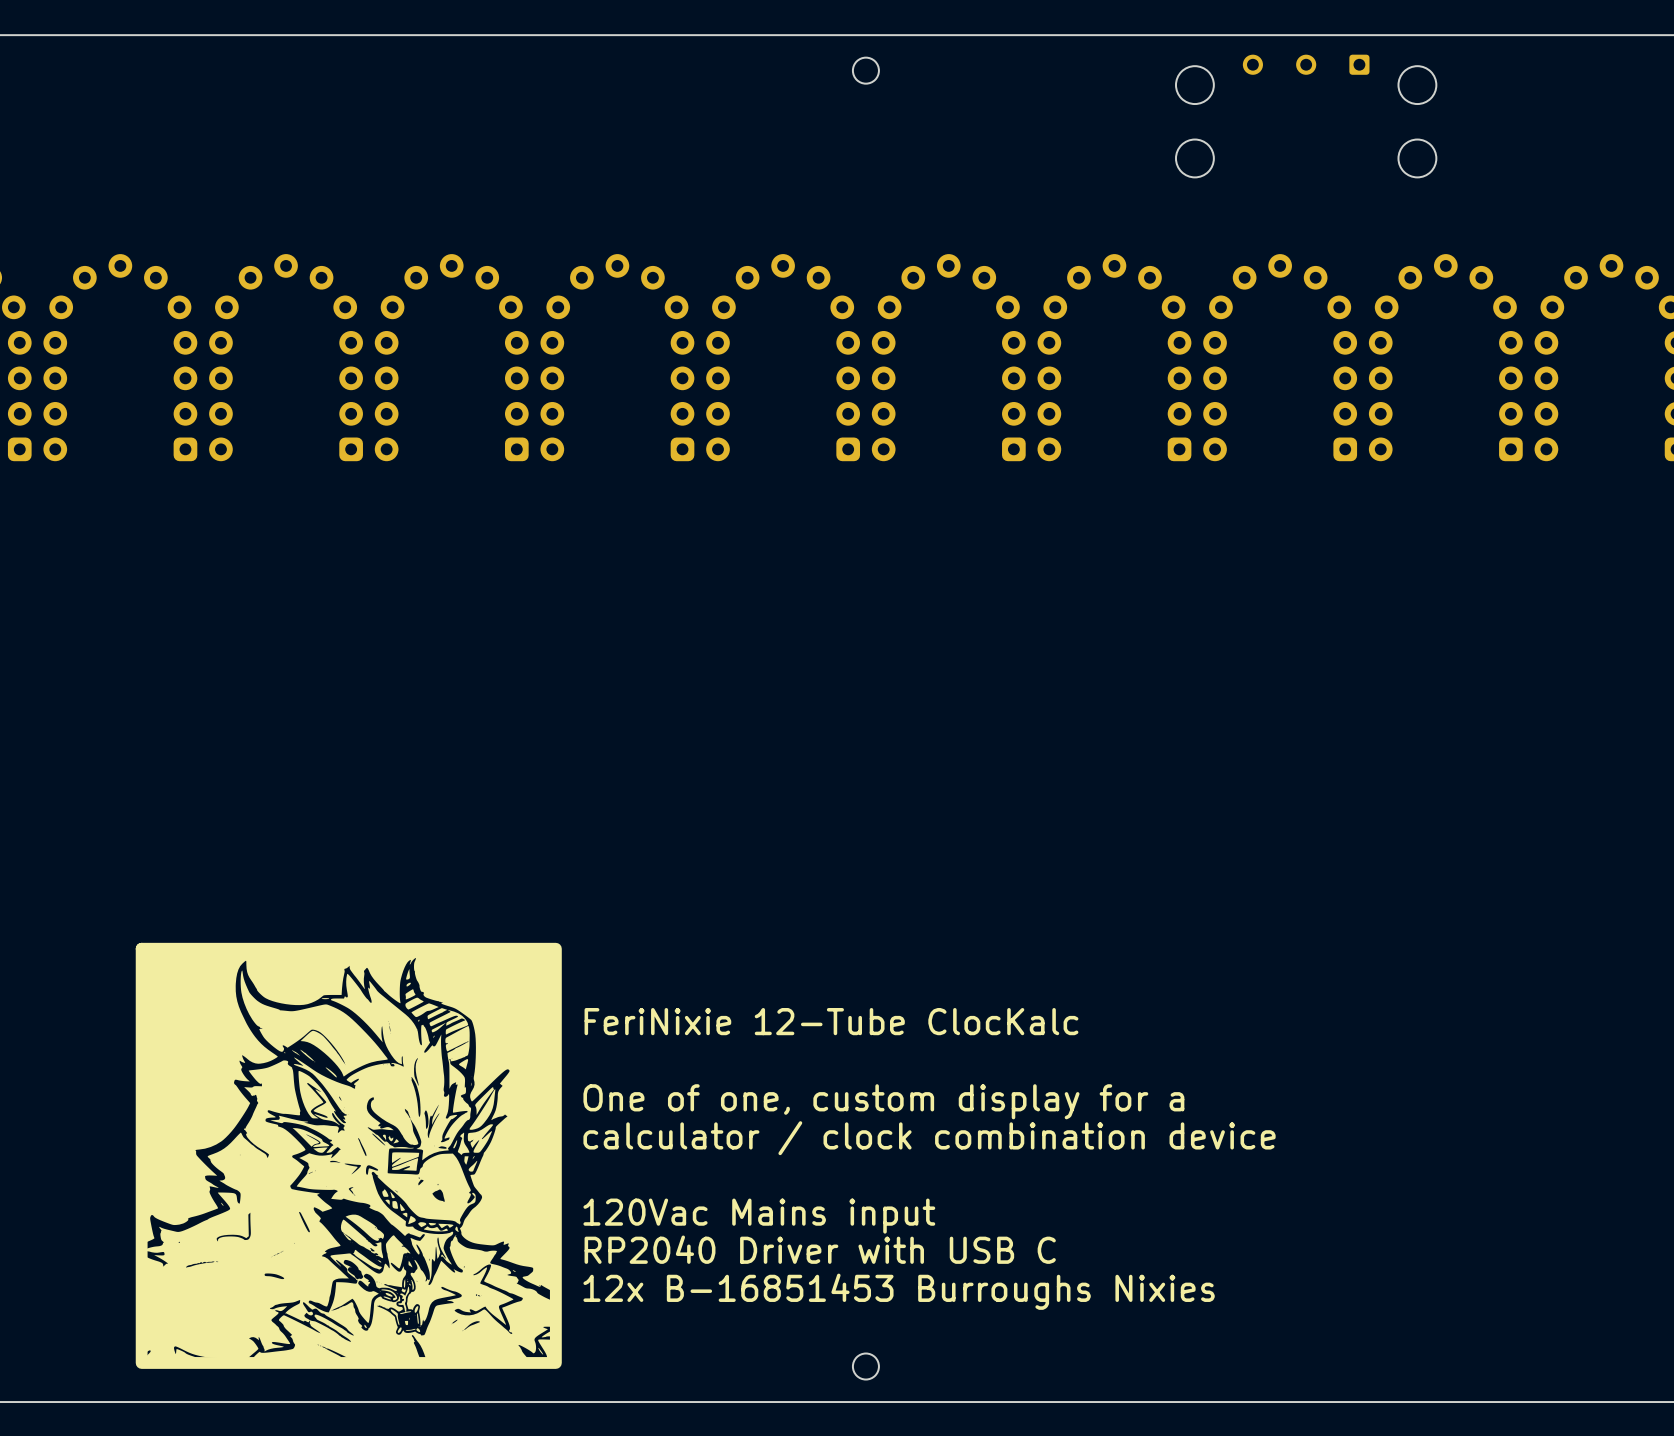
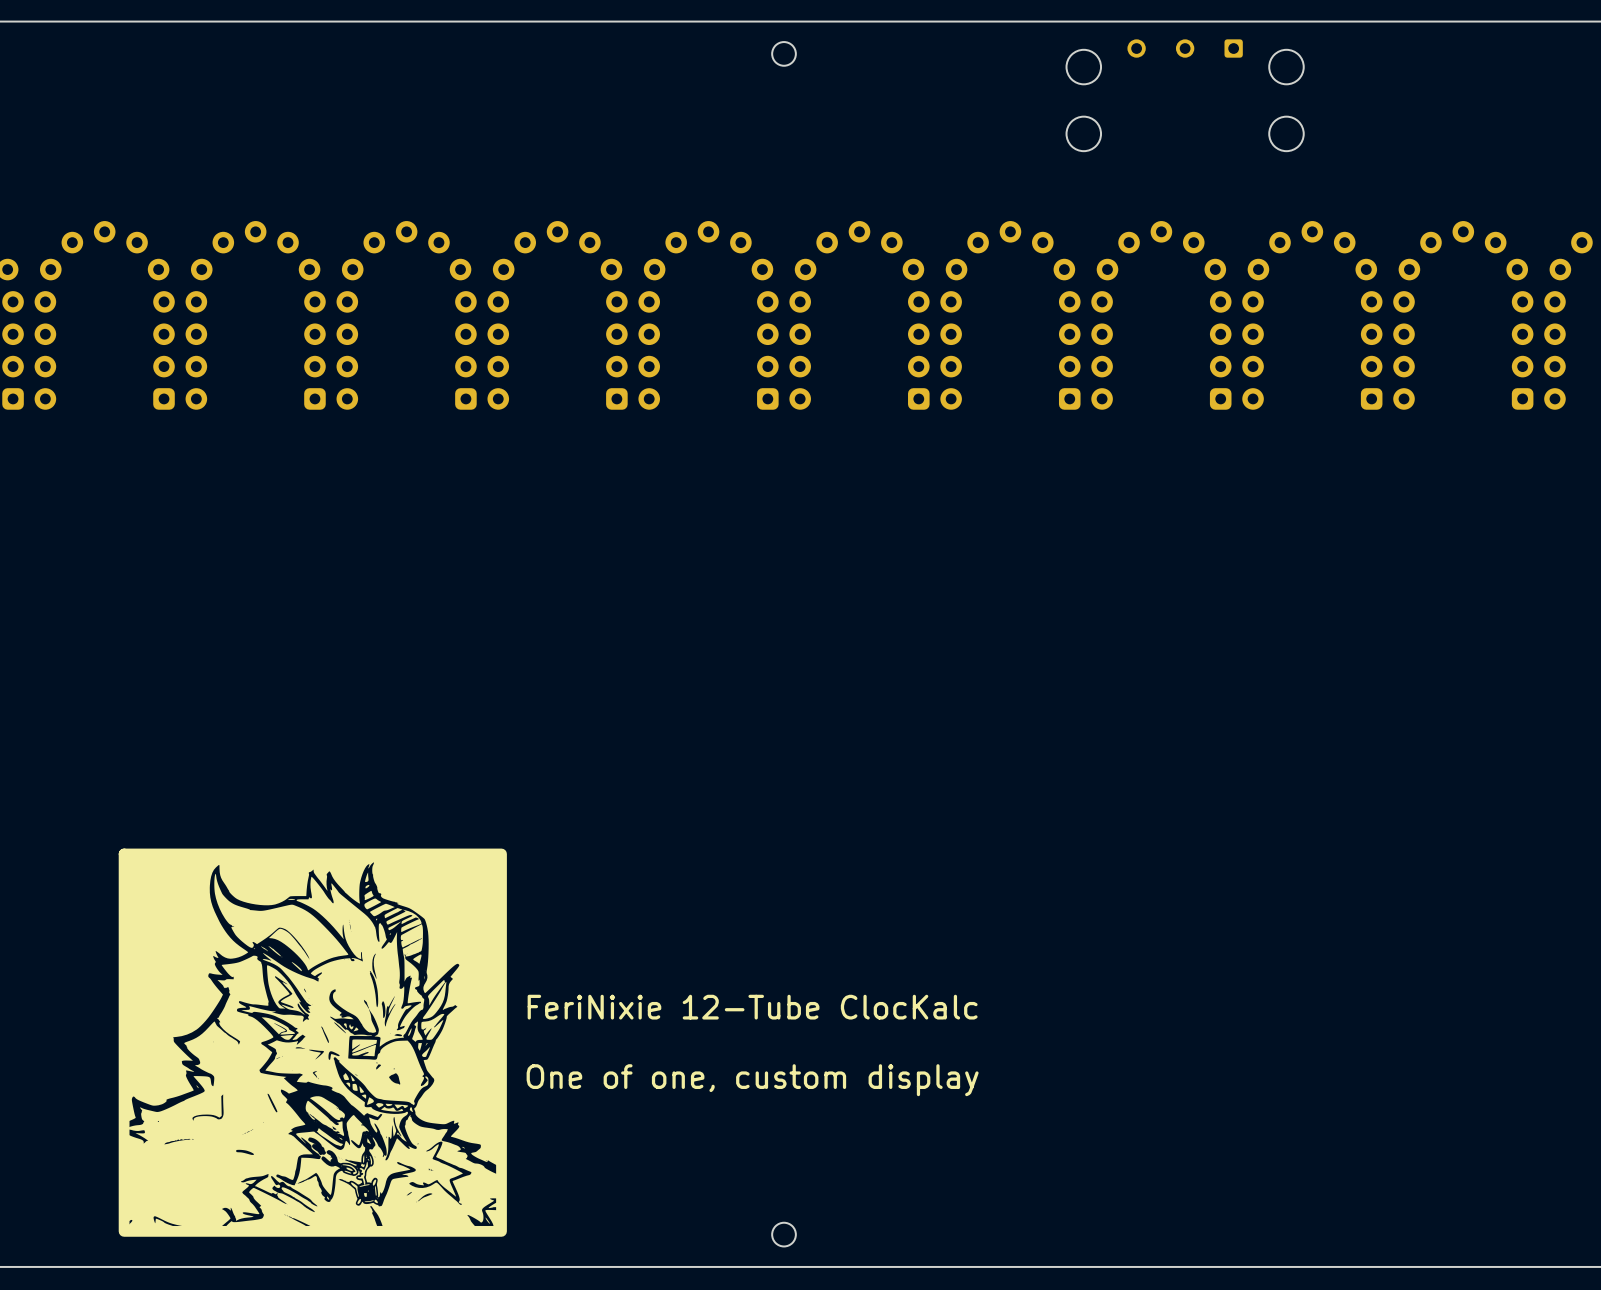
text position: FeriNixie 12-Tube ClocKalc (831, 1021) -> FeriNixie 12-Tube ClocKalc (752, 1007)
text: One of one, custom display for a (883, 1101) -> none
text: calculator / clock combination device (929, 1138) -> none
text: none -> One of one, custom display (752, 1080)
text: 120Vac Mains input (759, 1216) -> none
text: RP2040 Driver with USB C (820, 1249) -> none
text: 12x B-16851453 Burroughs Nixies (899, 1291) -> none

